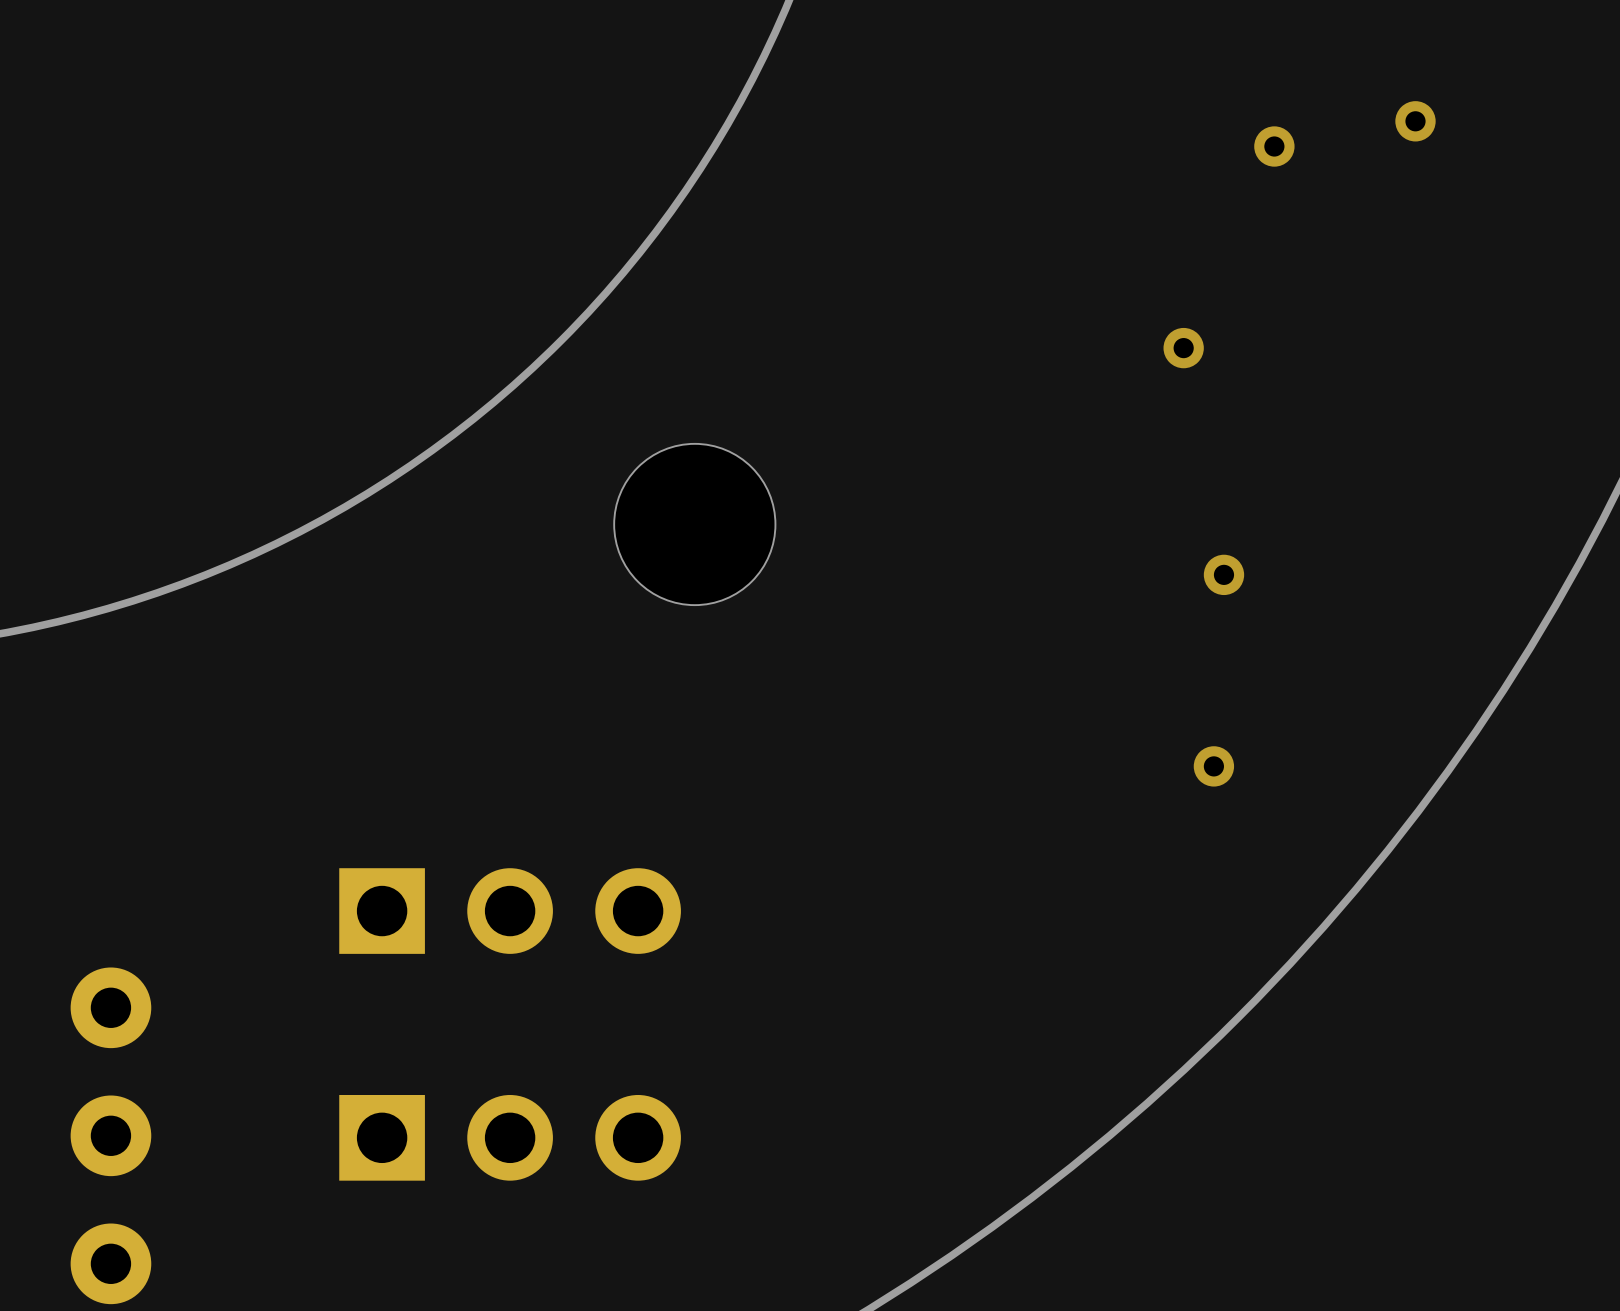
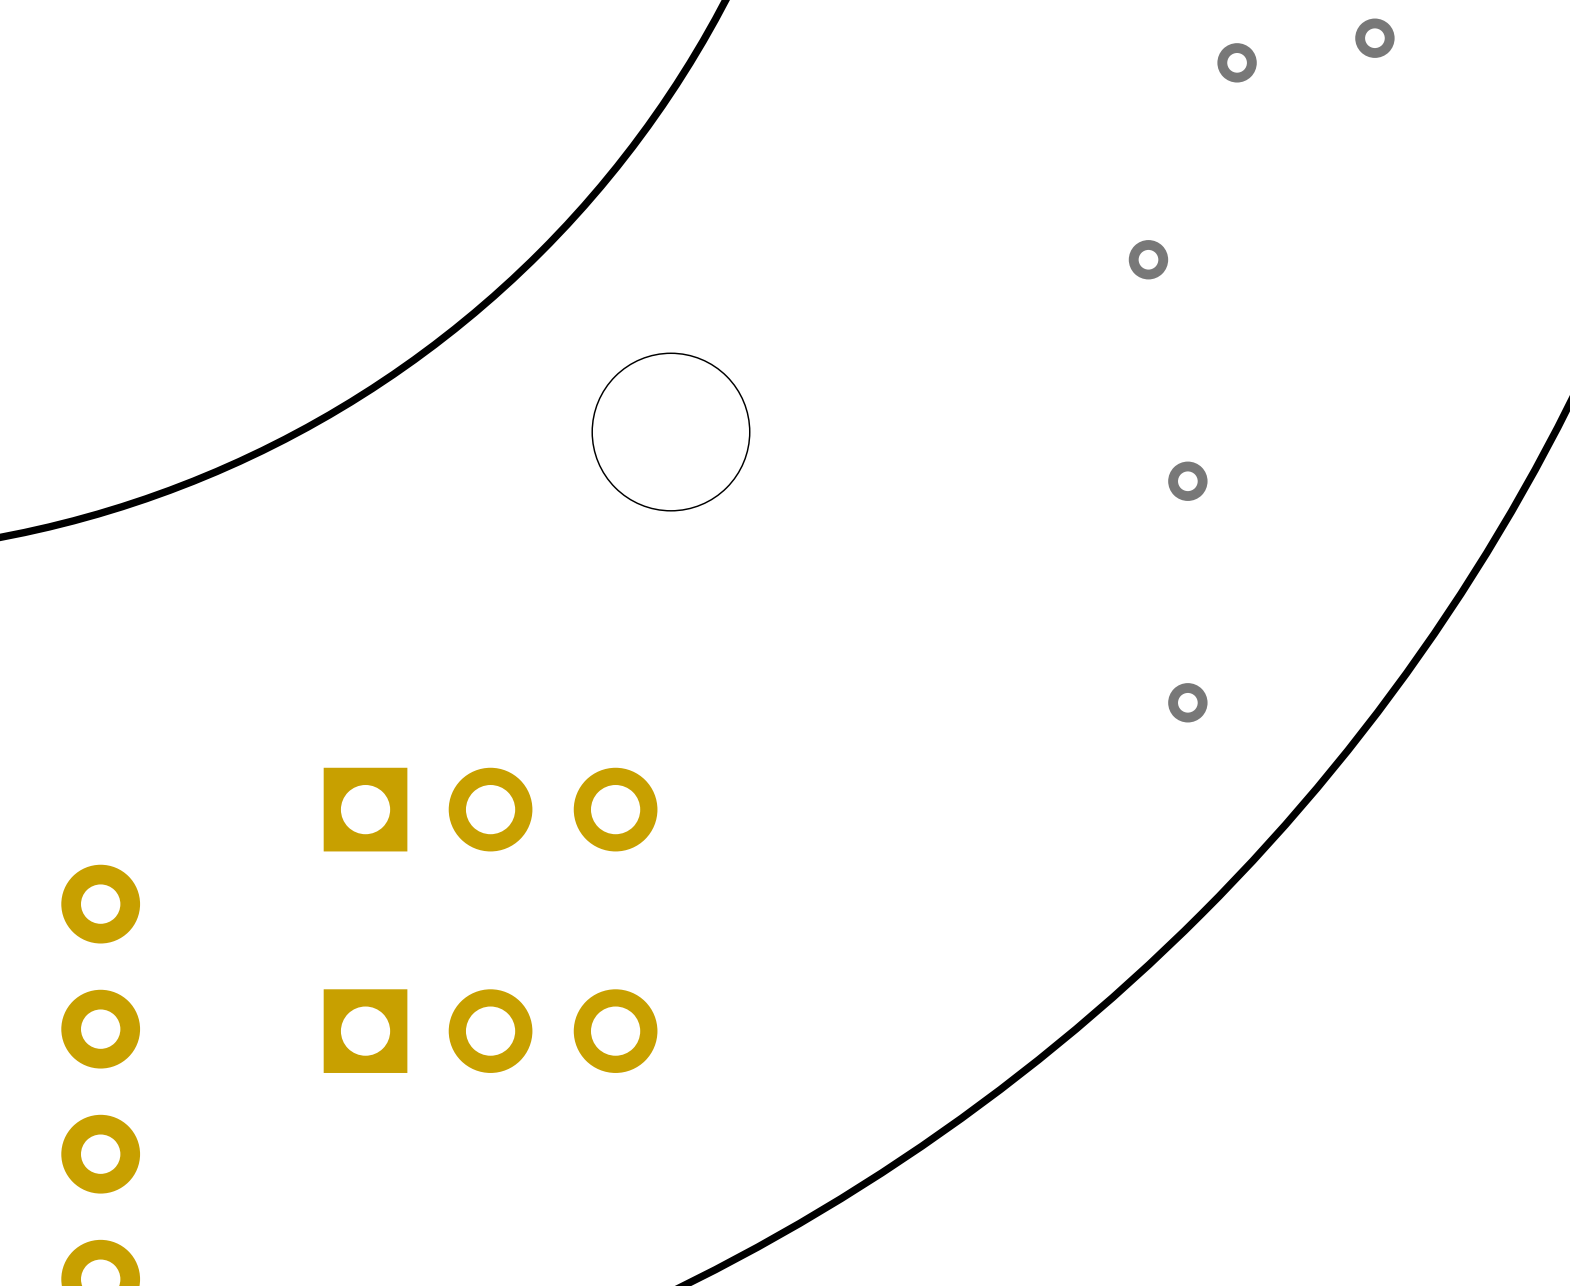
via position: (1213, 766) -> (1187, 702)

